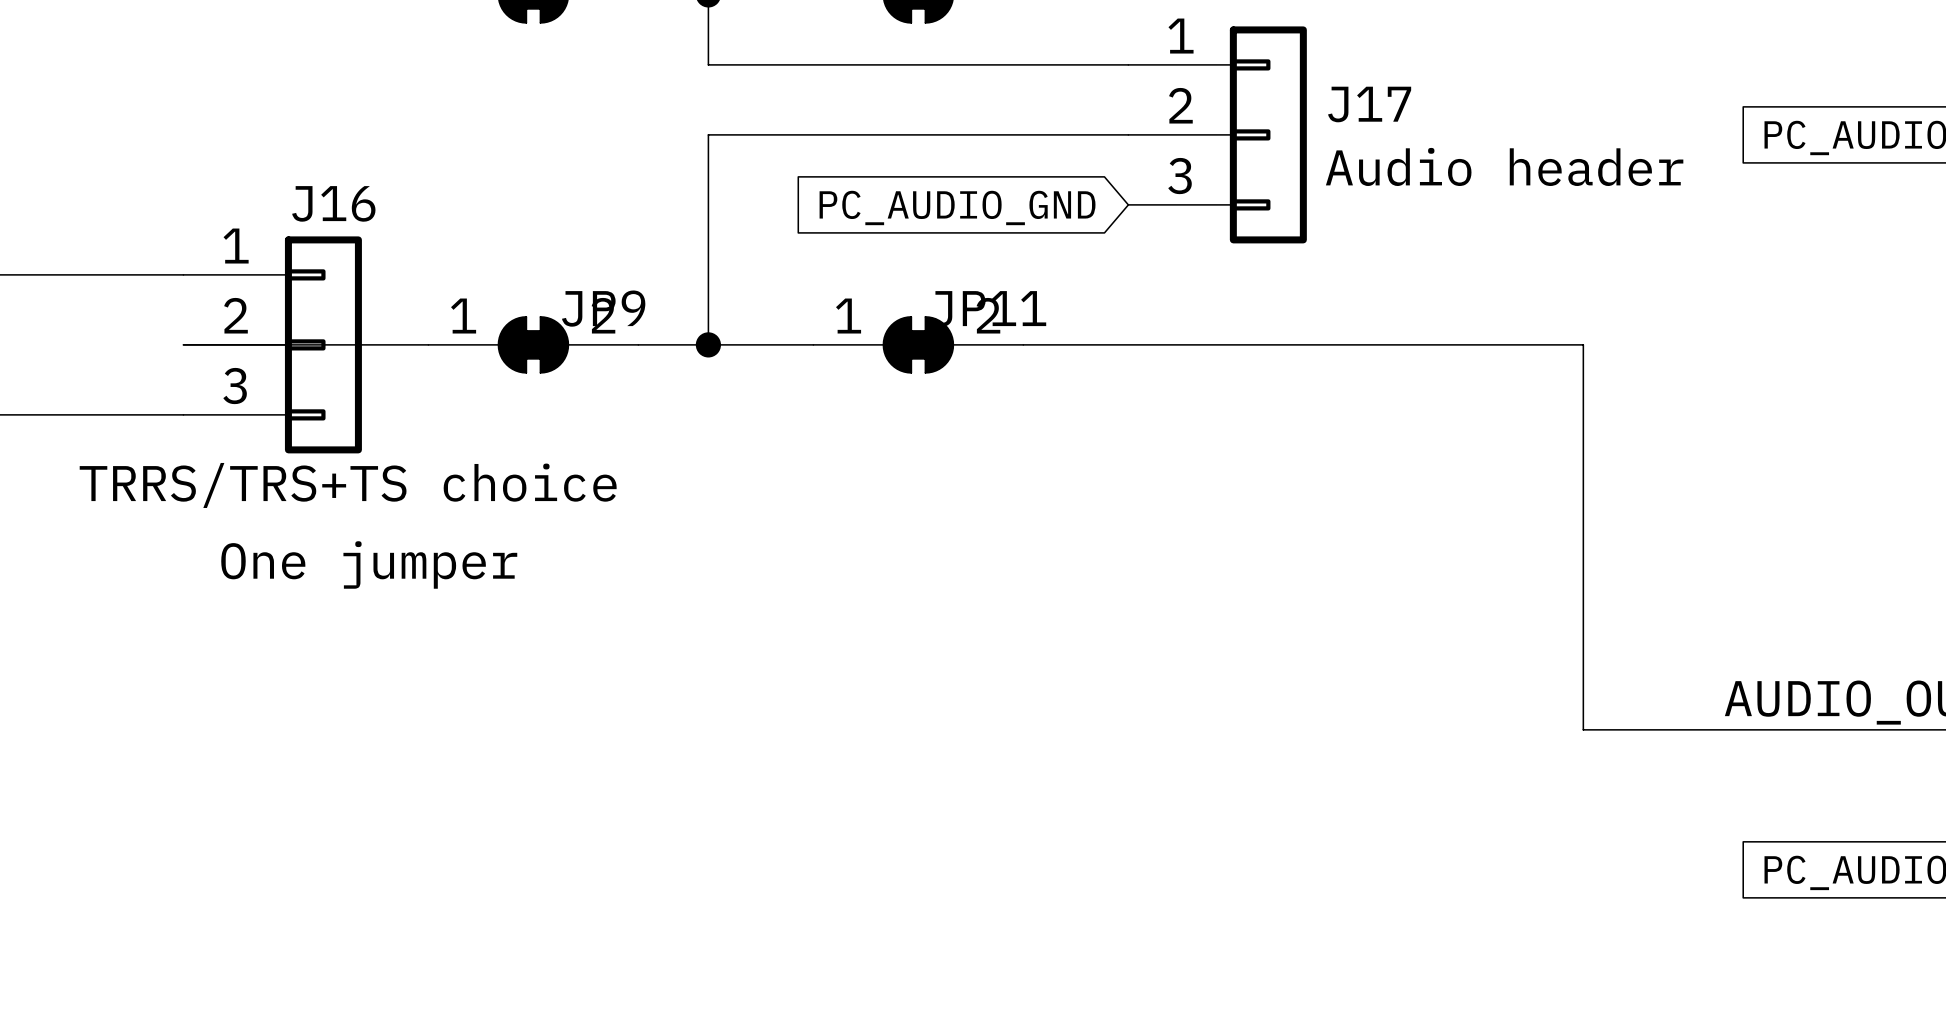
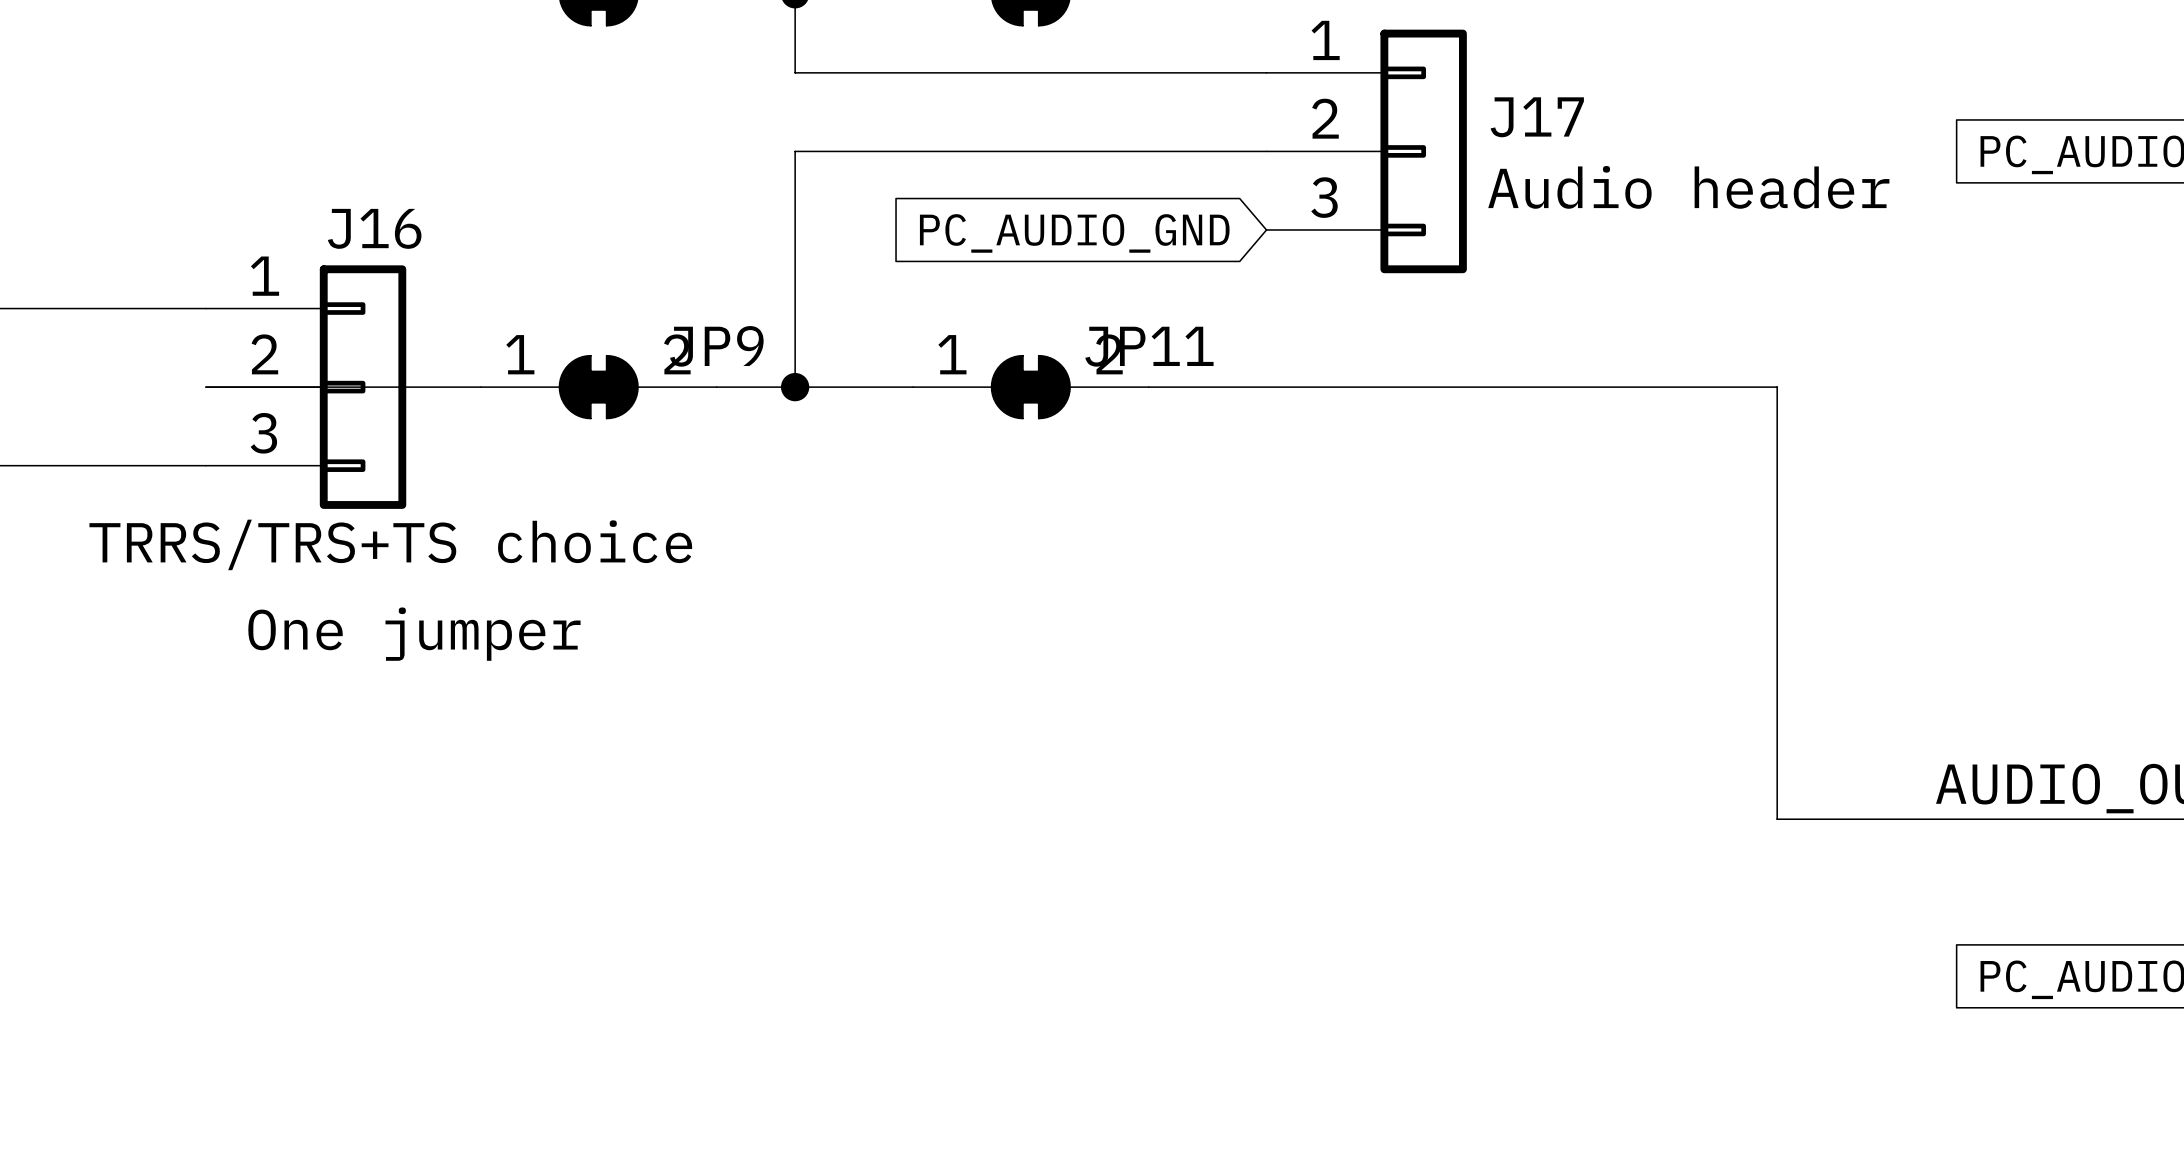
JP9 name position: JP9 (603, 308) -> JP9 (716, 346)
JP11 name position: JP11 (989, 308) -> JP11 (1149, 346)

